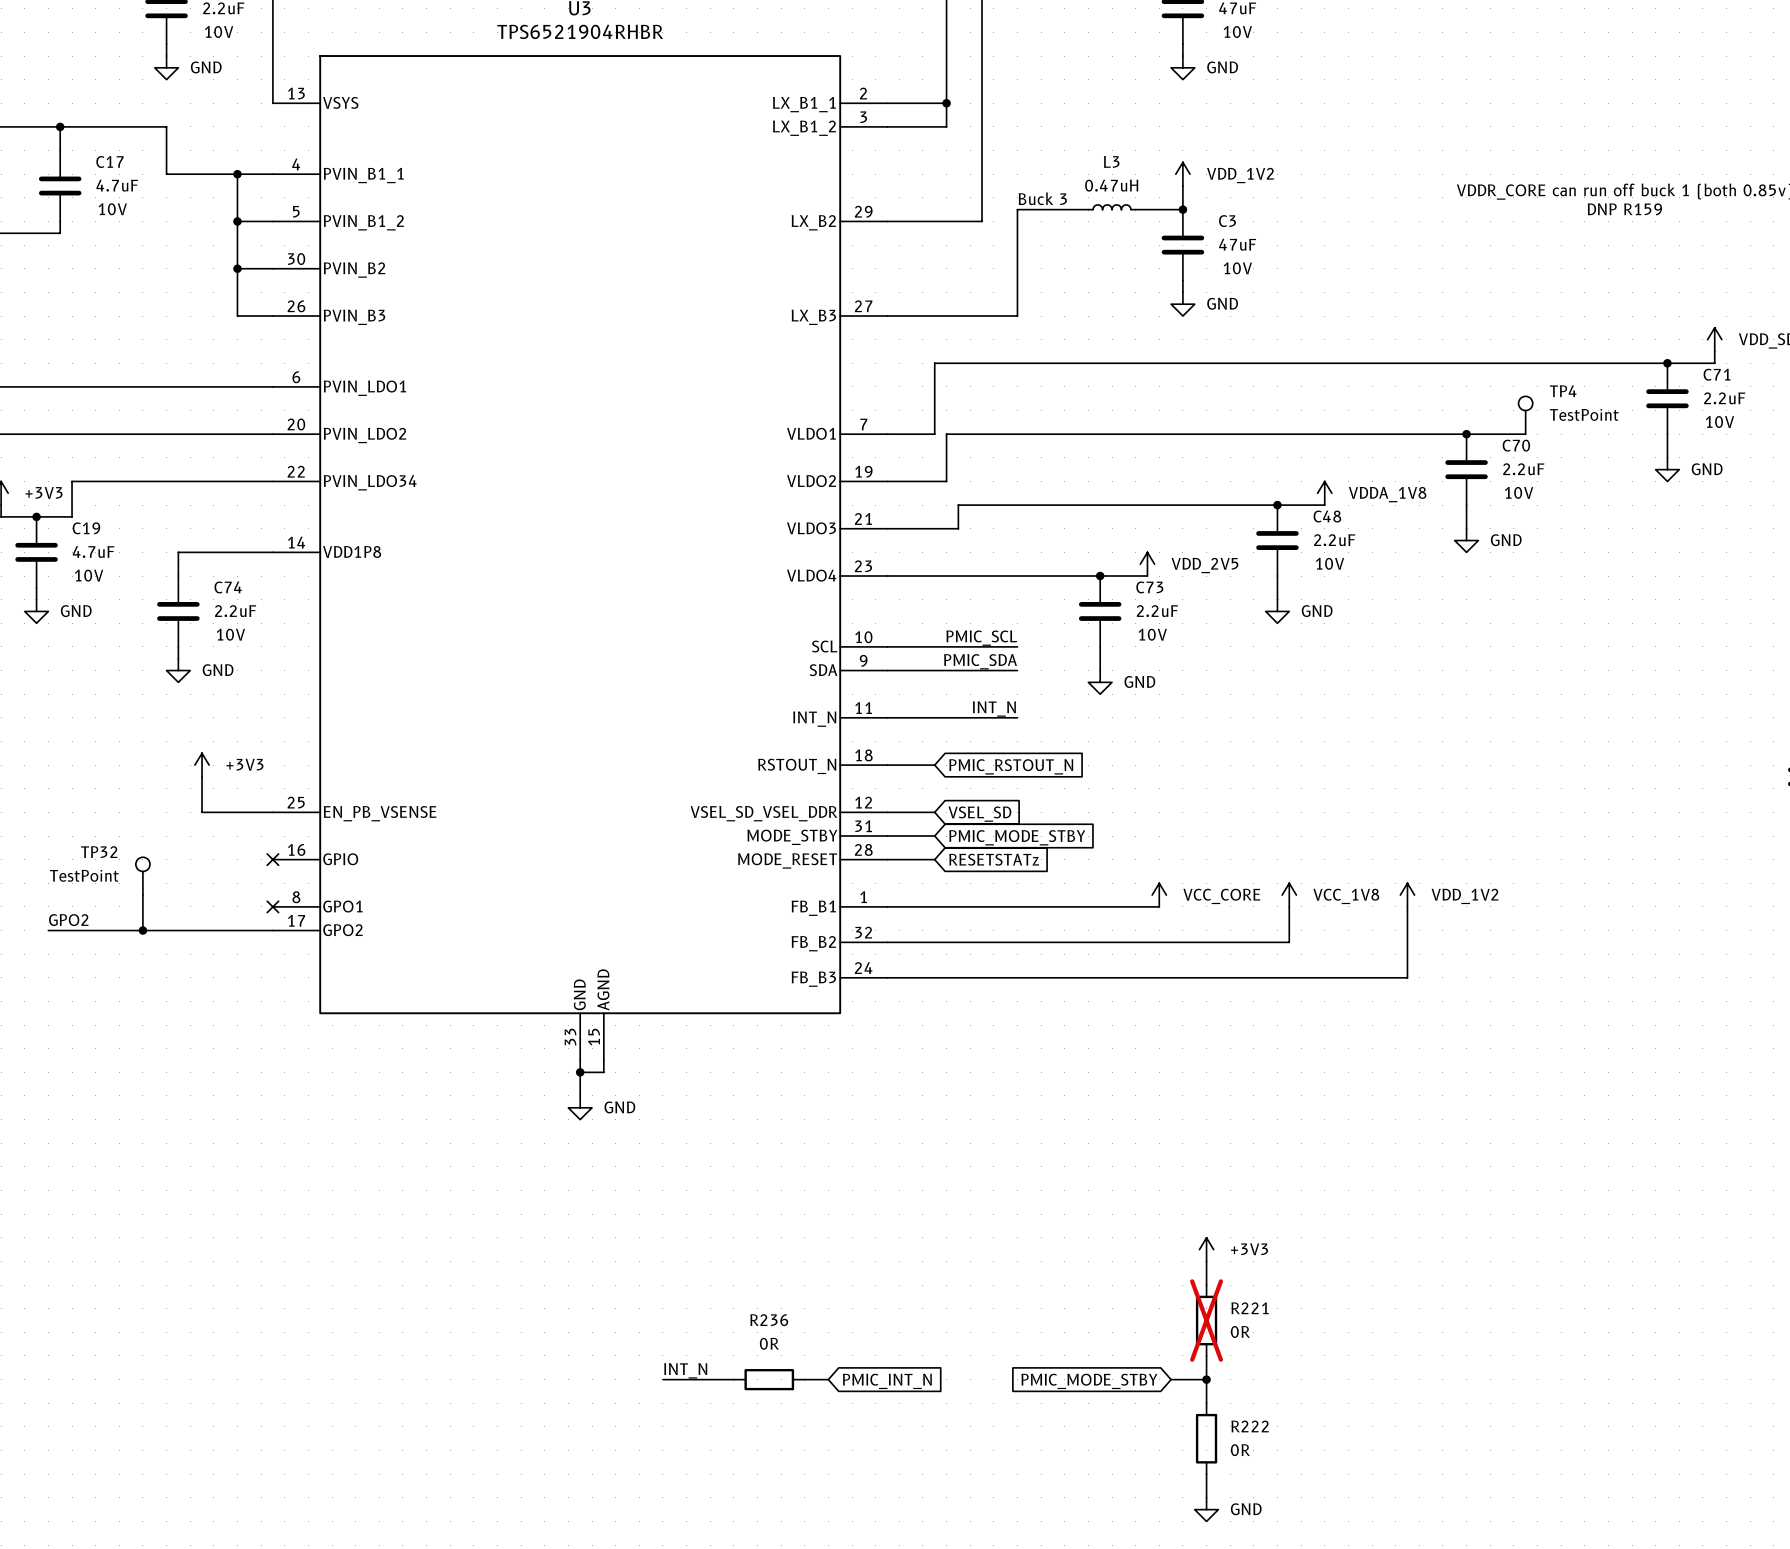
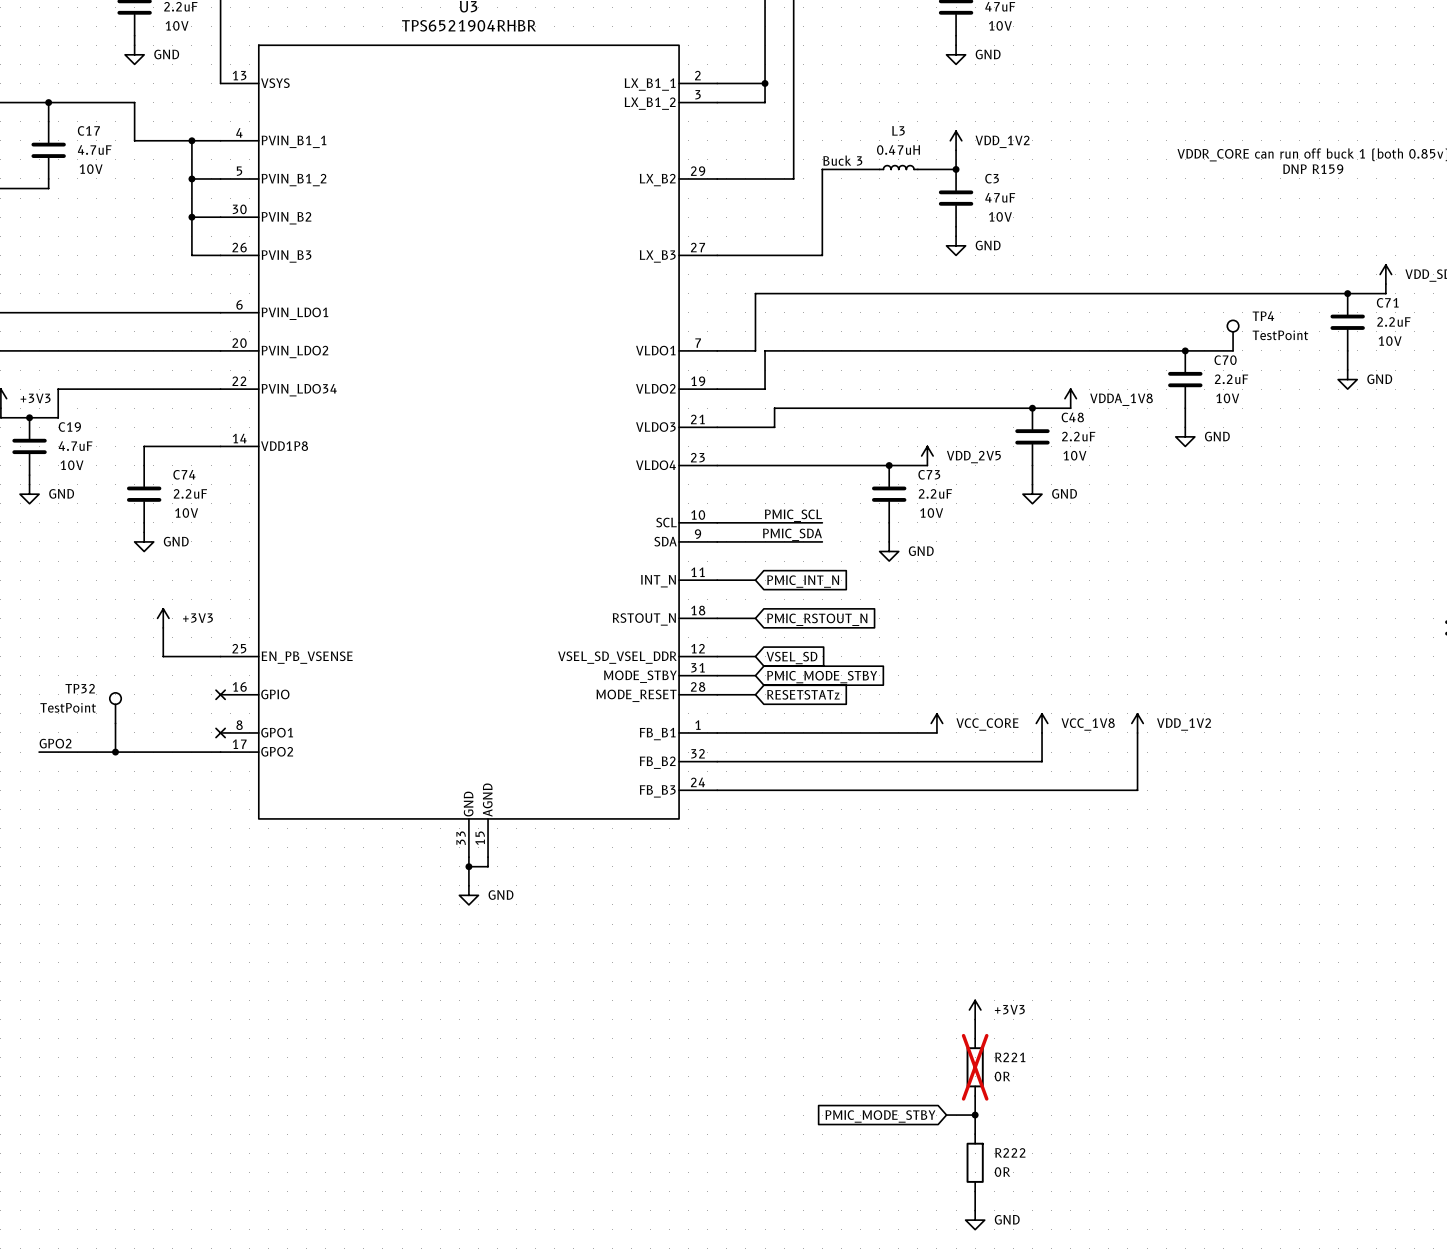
label: INT_N (994, 709) -> none
wire: (934, 717) (1017, 717) -> none
global label: none -> PMIC_INT_N (803, 581)
label: INT_N (685, 1370) -> none
wire: (662, 1379) (733, 1379) -> none
R236: 0R (769, 1379) -> none
wire: (804, 1379) (828, 1379) -> none
global label: PMIC_INT_N (887, 1381) -> none

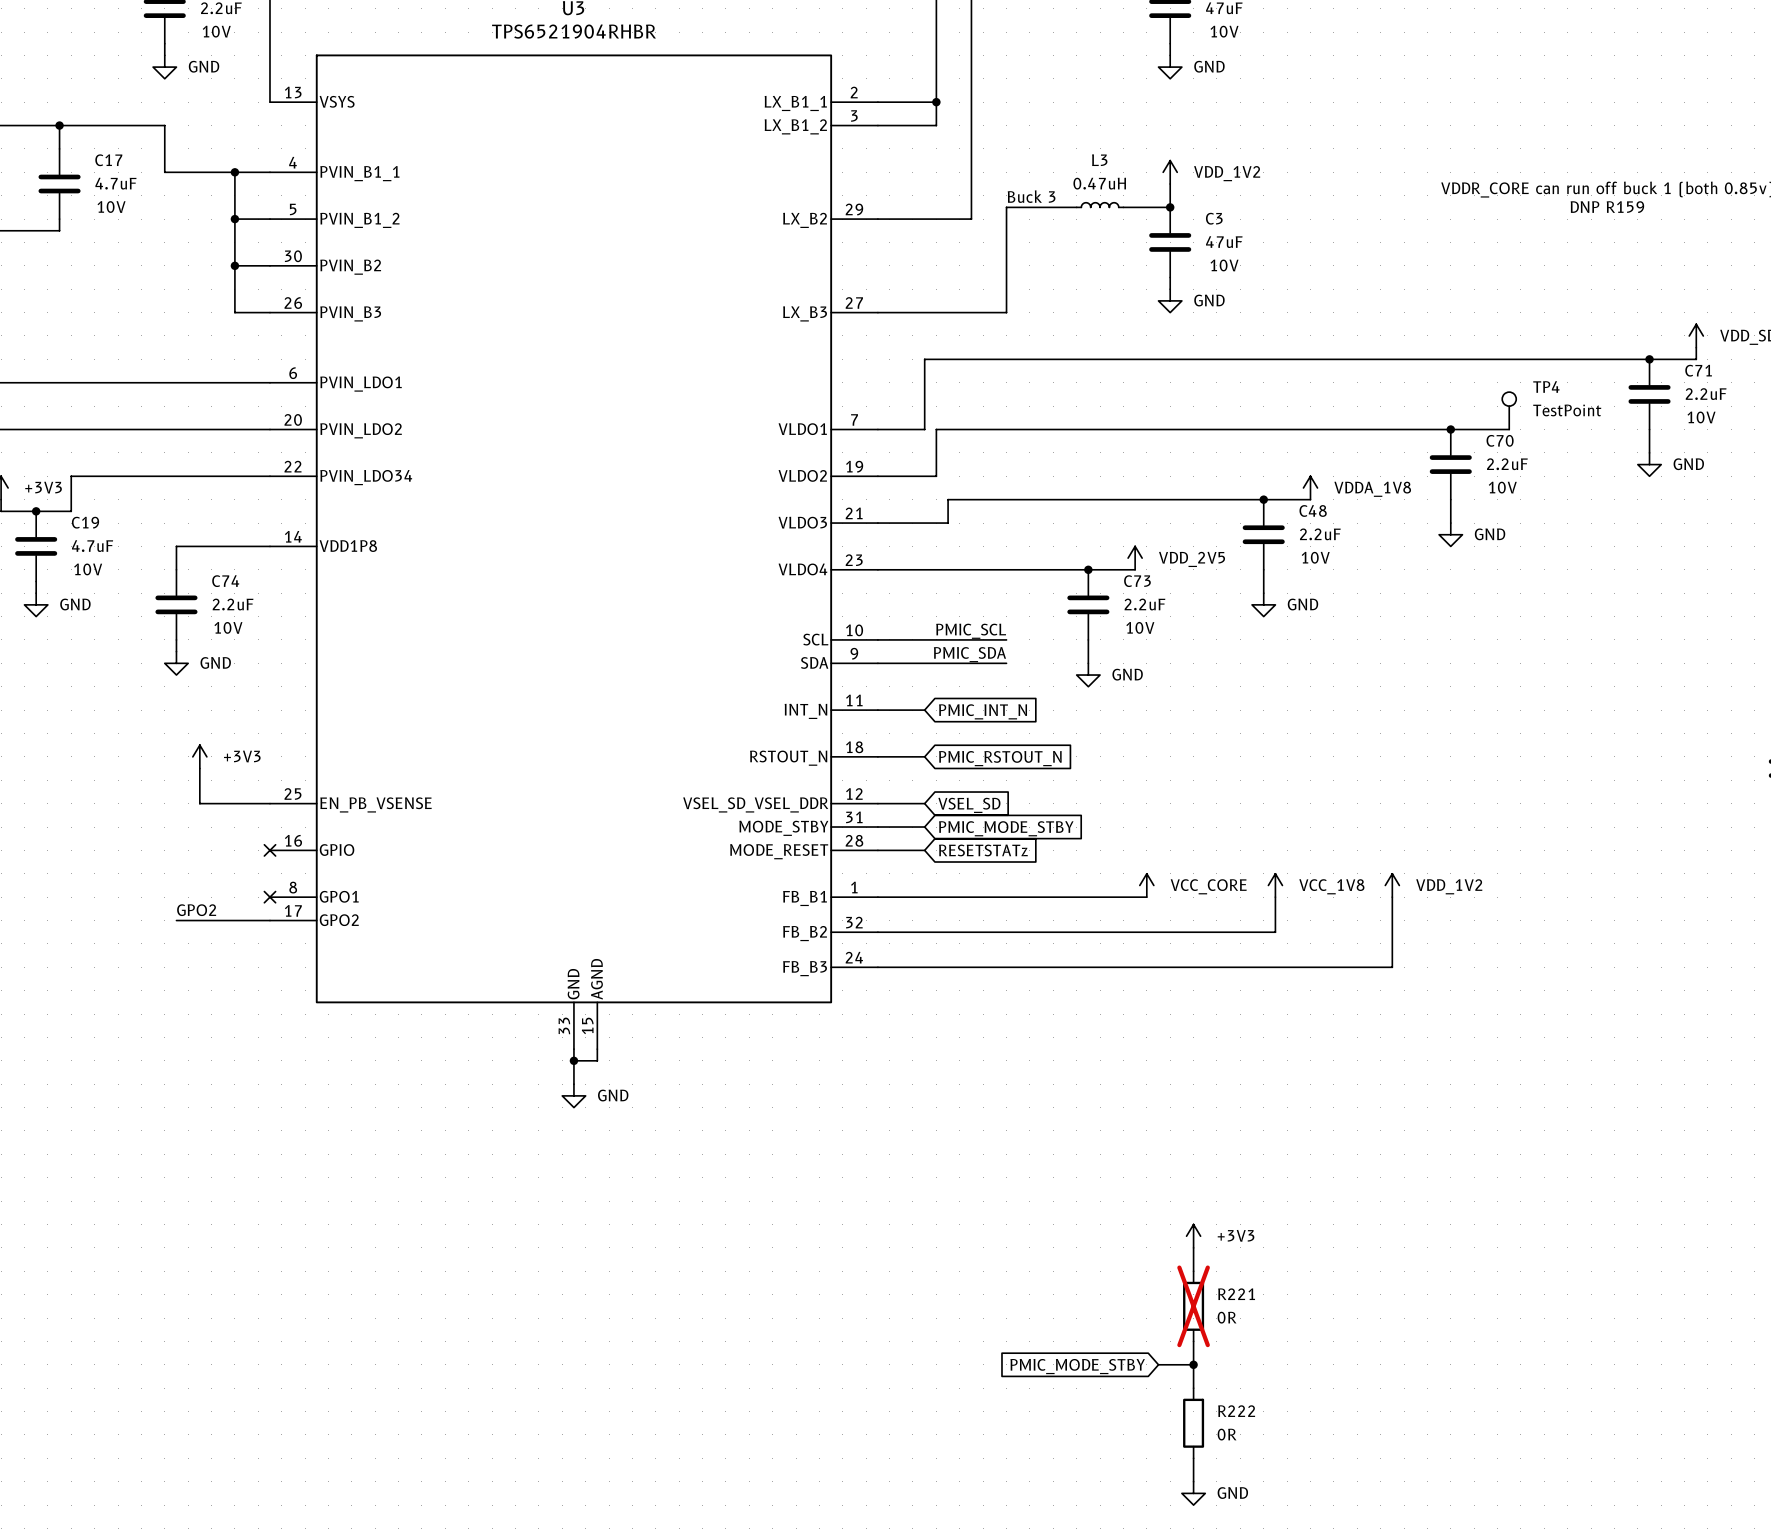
TP32: TestPoint (115, 708) -> none
wire: (115, 723) (115, 752) -> none
label position: GPO2 (55, 743) -> GPO2 (196, 910)
wire: (39, 752) (144, 752) -> none
junction: (115, 752) -> none

